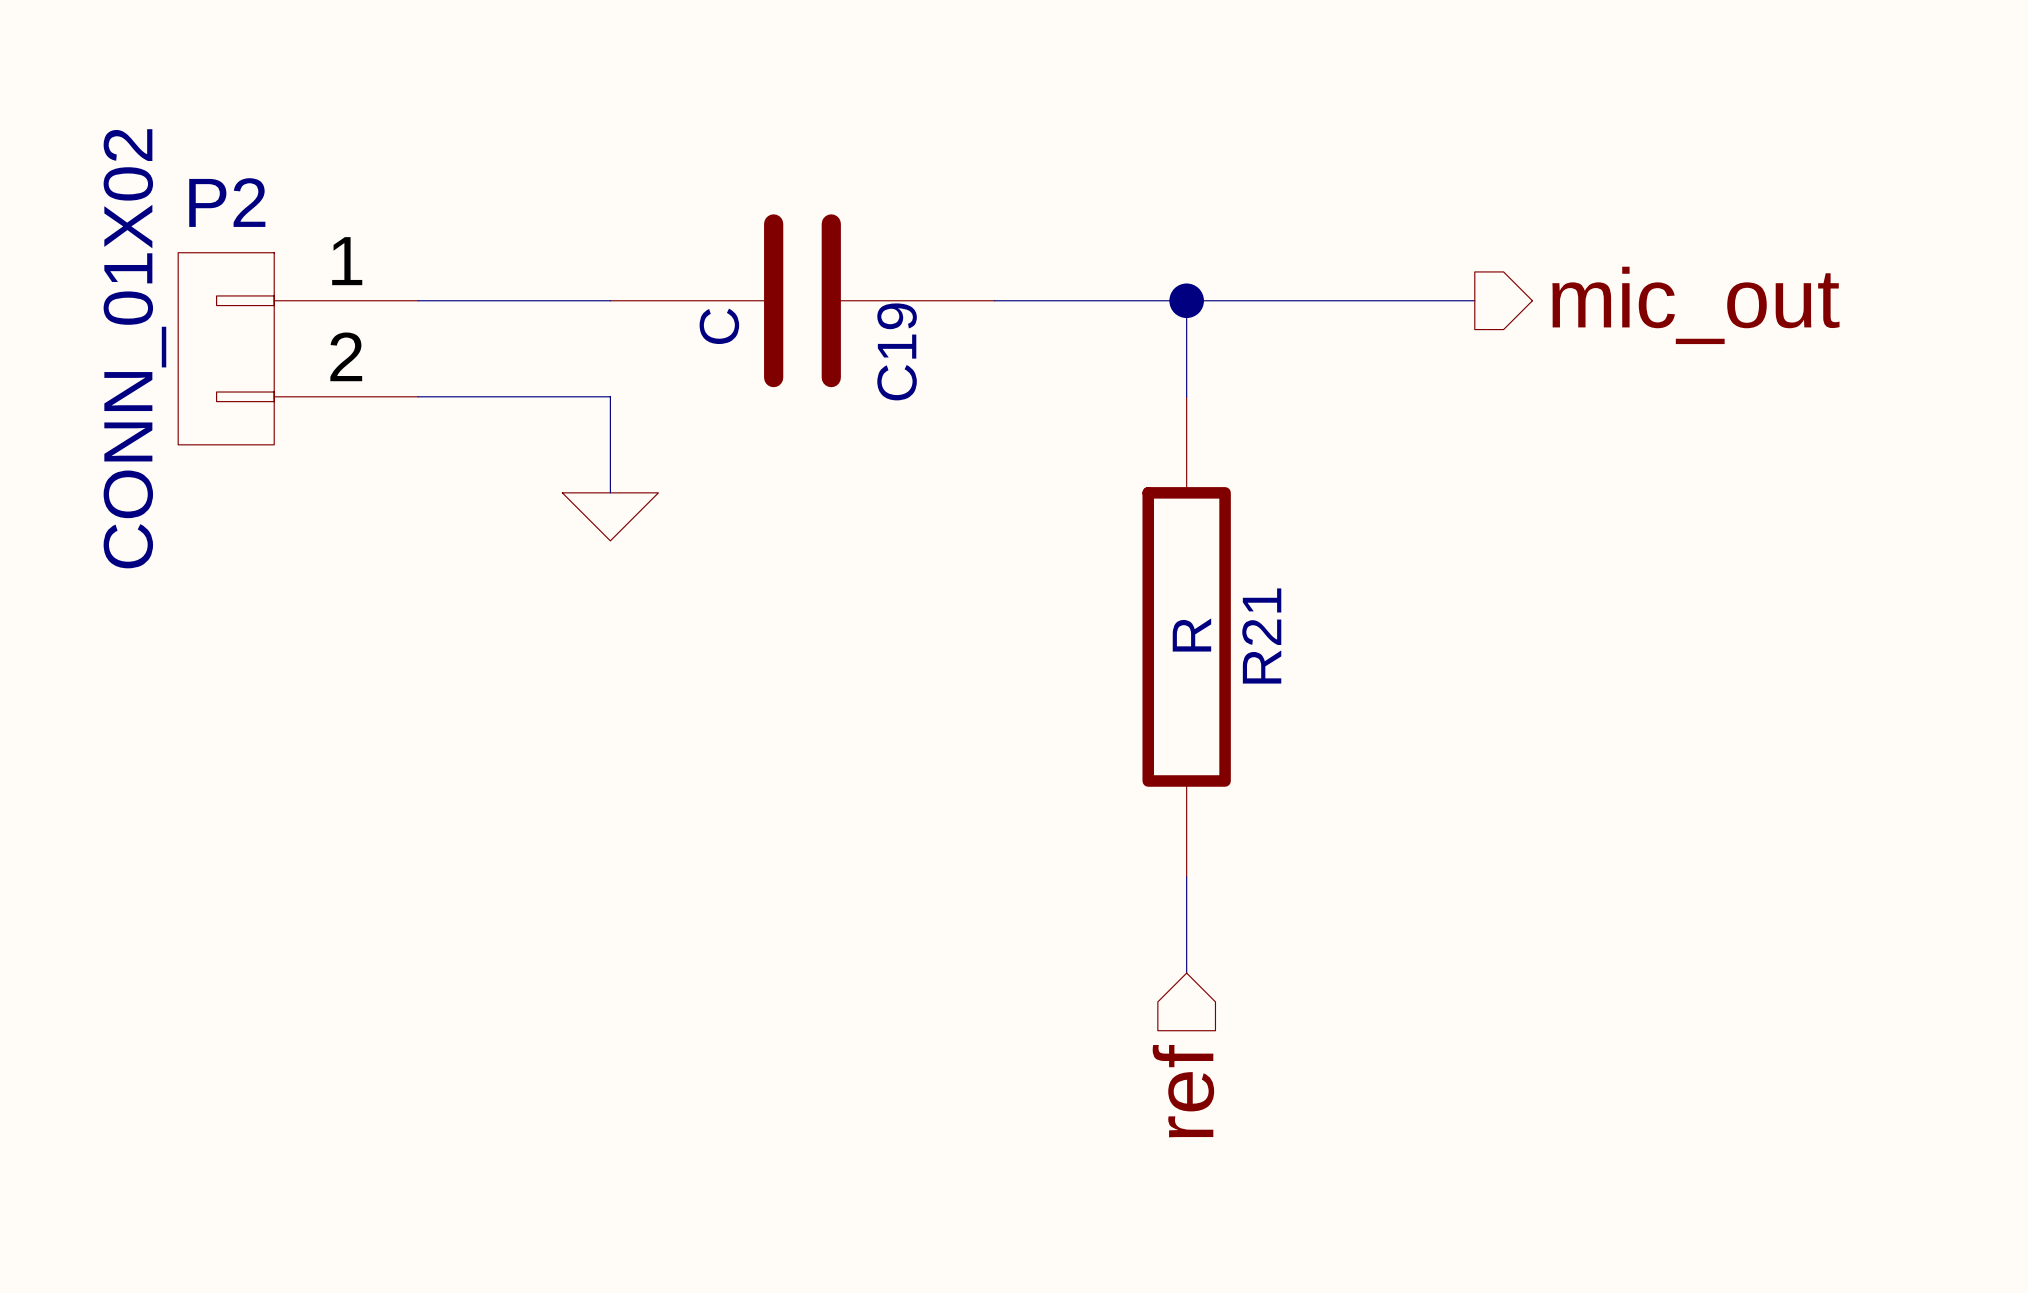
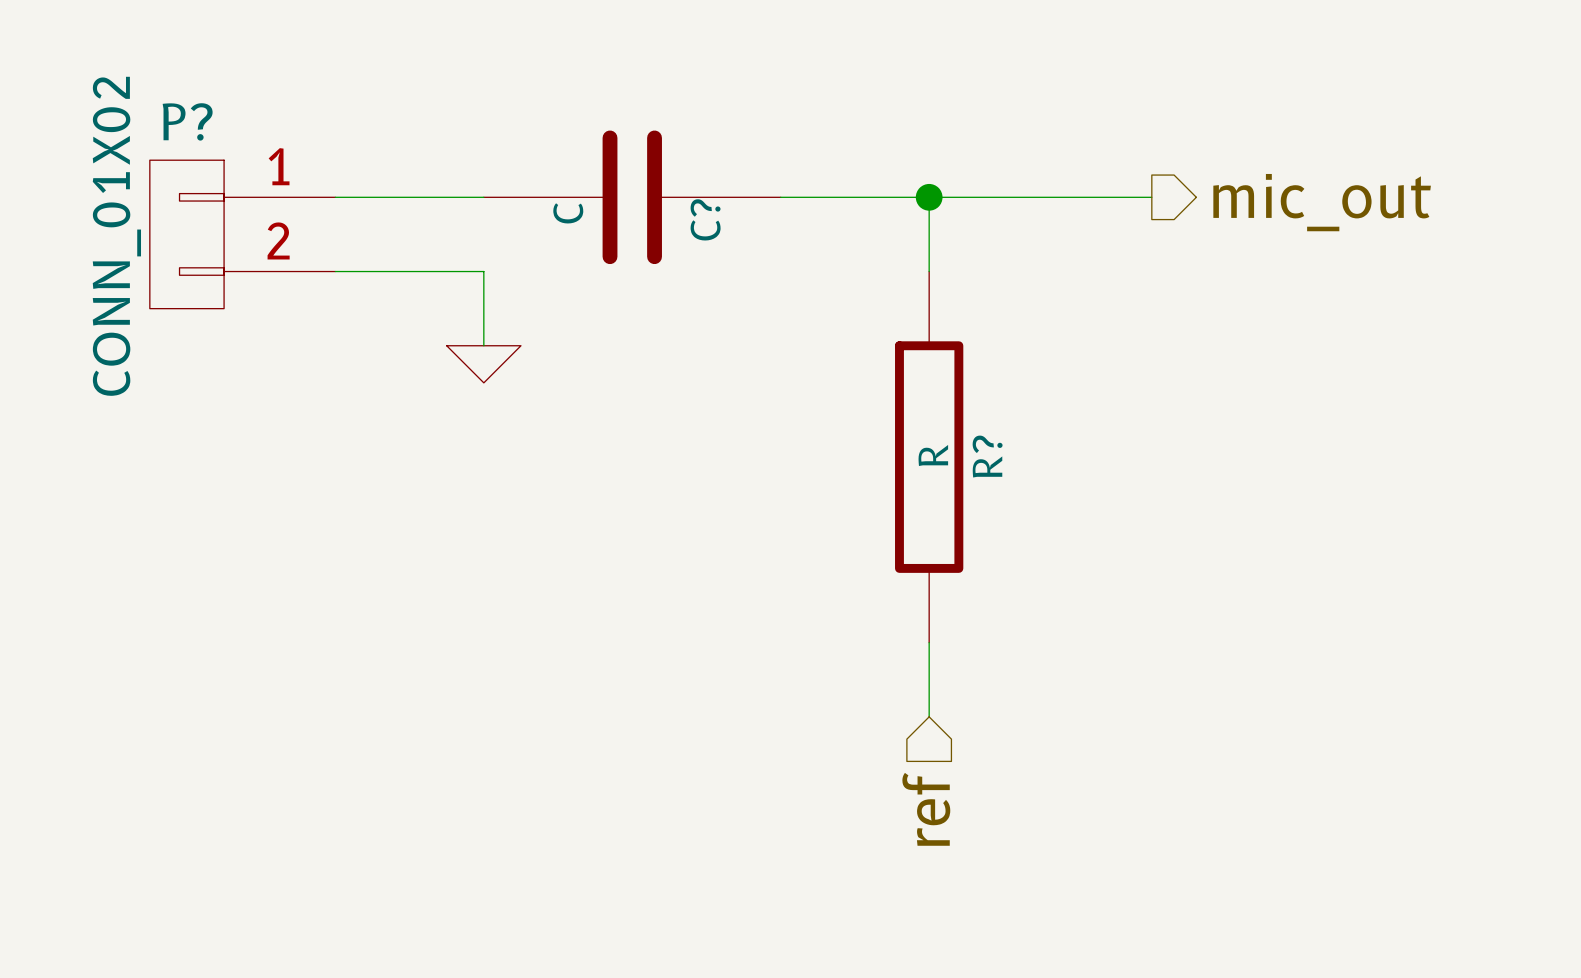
P2 name: P2 (227, 202) -> P? (187, 121)
C19 name: C19 (897, 351) -> C? (705, 219)
R21 name: R21 (1261, 636) -> R? (987, 456)

